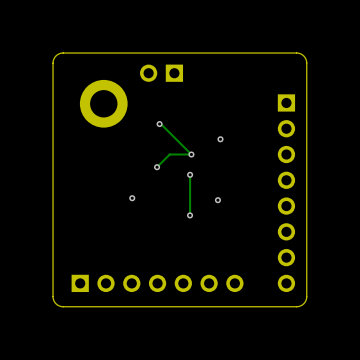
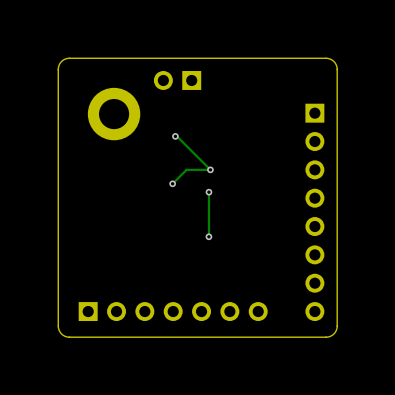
via: (220, 139) -> none
via: (132, 198) -> none
via: (217, 200) -> none

